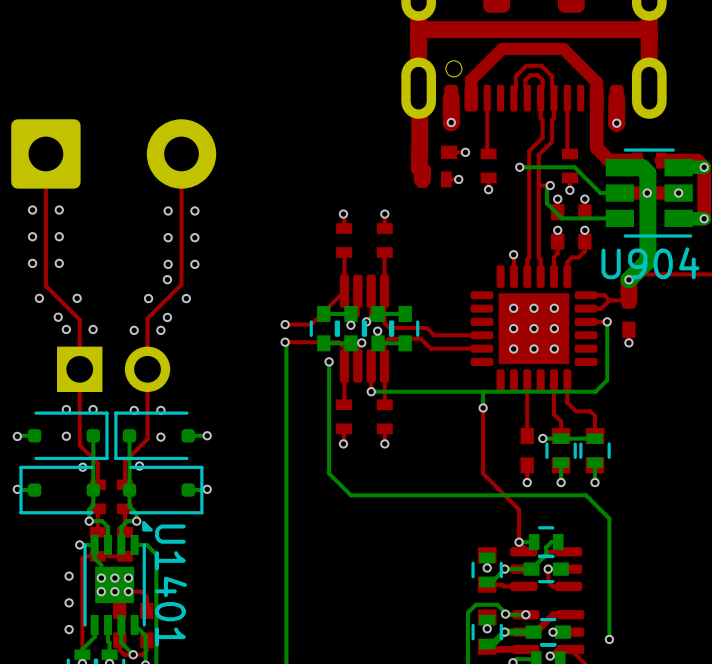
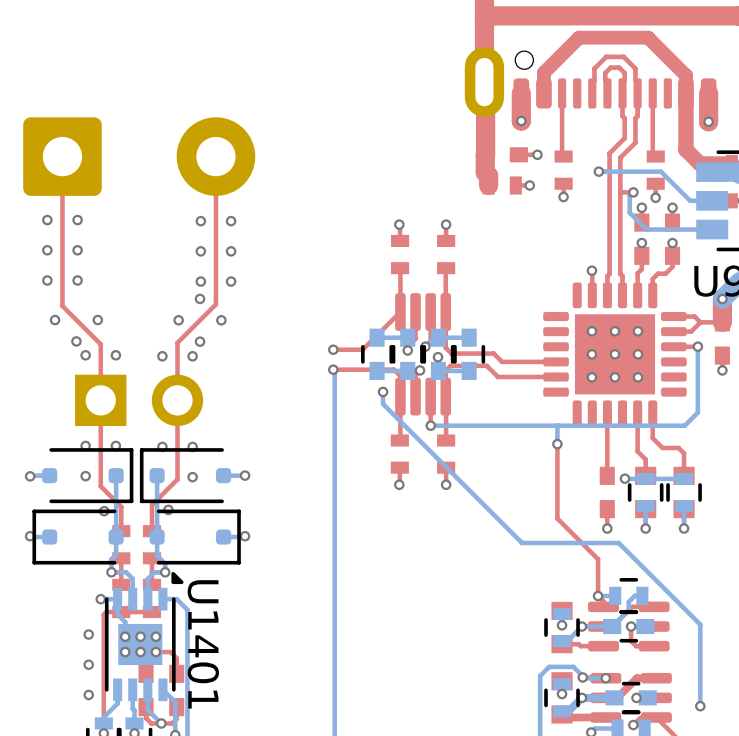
bottom track: (329, 372) (329, 473) (350, 495) (451, 495) -> (383, 404) (522, 543)
bottom track: (537, 495) (586, 495) (609, 518) (609, 567) -> (618, 543) (700, 624)

